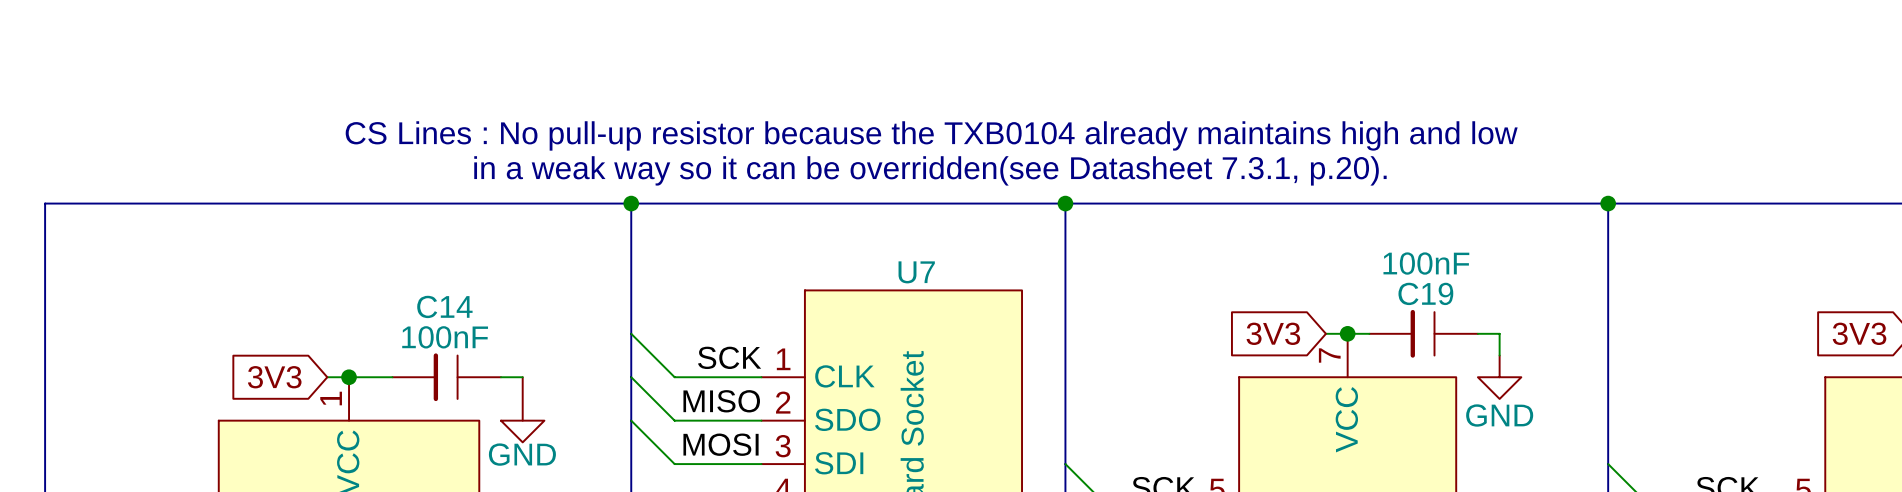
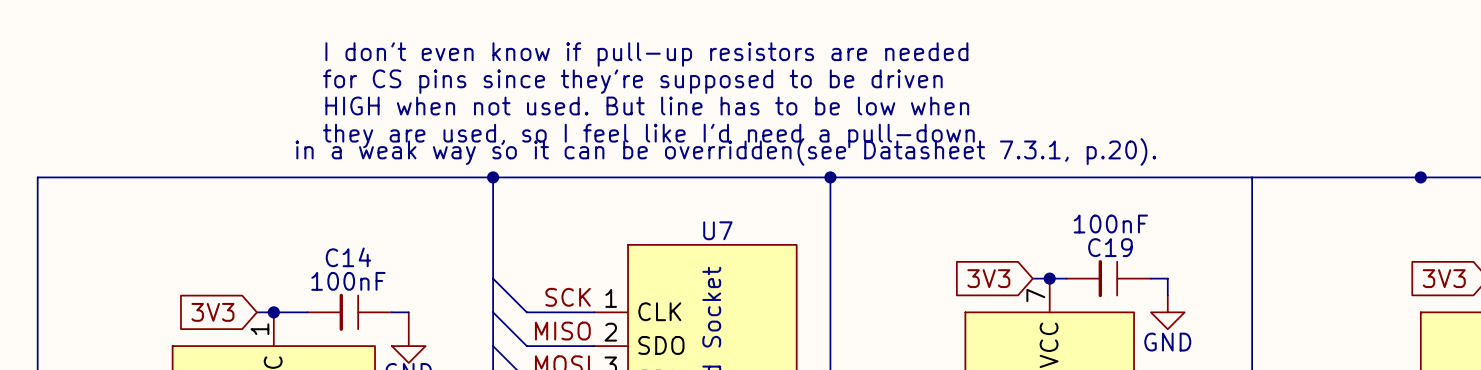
text: none -> I don't even know if pull-up resistors are needed (646, 54)
text: none -> for CS pins since they're supposed to be driven (632, 81)
text: none -> HIGH when not used. But line has to be low when (647, 106)
text: CS Lines : No pull-up resistor because the TXB0104 already maintains high and low (931, 135) -> none
text: none -> they are used, so I feel like I'd need a pull-down (648, 135)
junction: (1608, 203) -> none
junction: none -> (1420, 177)

